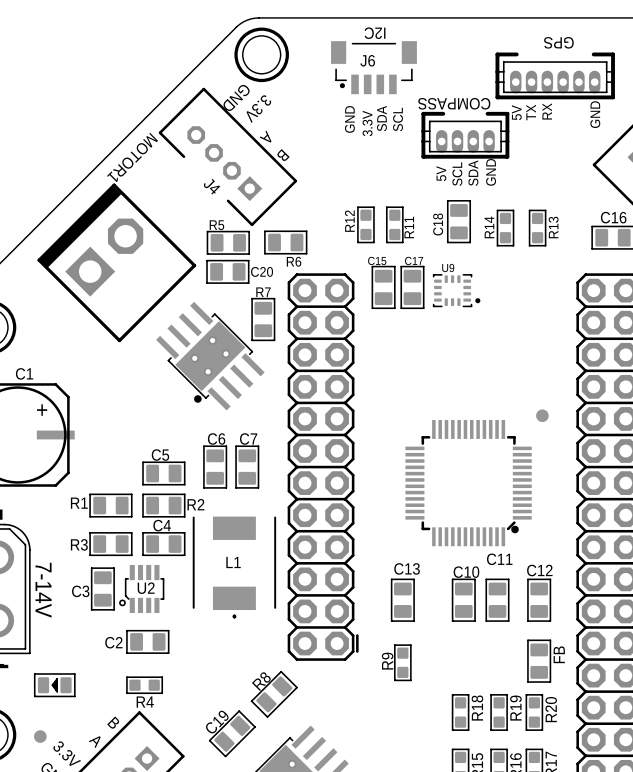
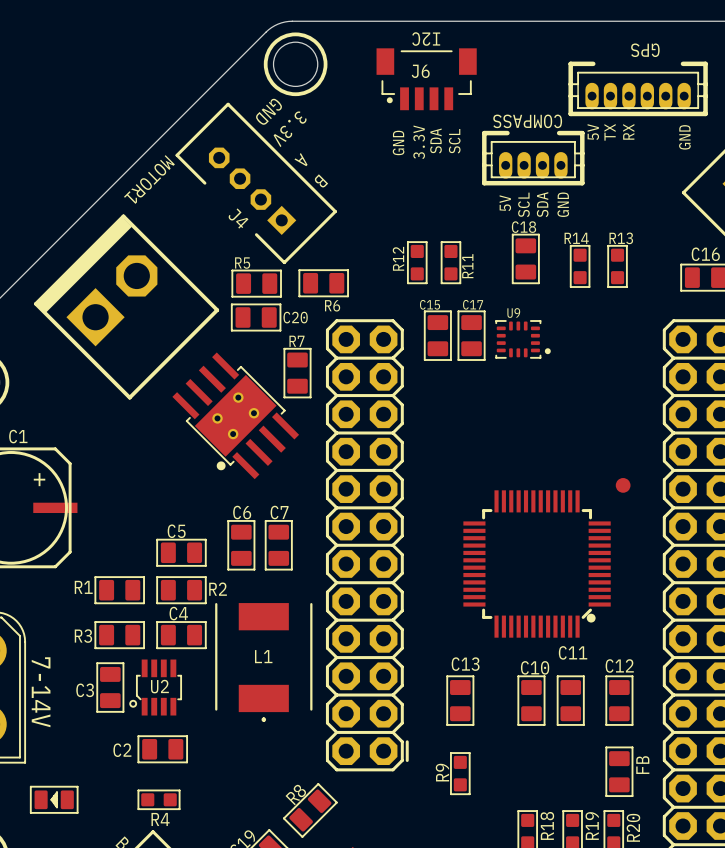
C18 name rotation: 0° (438, 224) -> 90° clockwise (523, 227)
C18 name position: C18 (438, 224) -> C18 (523, 227)
R14 name rotation: 0° (489, 227) -> 90° clockwise (576, 238)
R13 name rotation: 0° (553, 227) -> 90° clockwise (621, 238)

